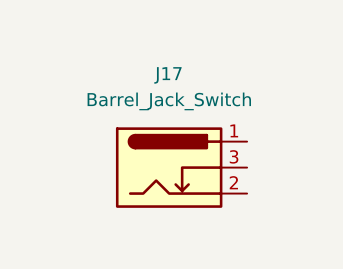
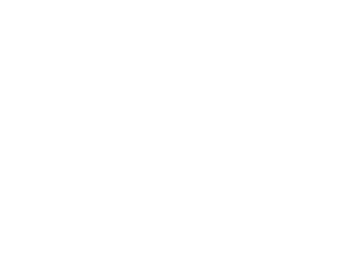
J17: Barrel_Jack_Switch (181, 167) -> none

